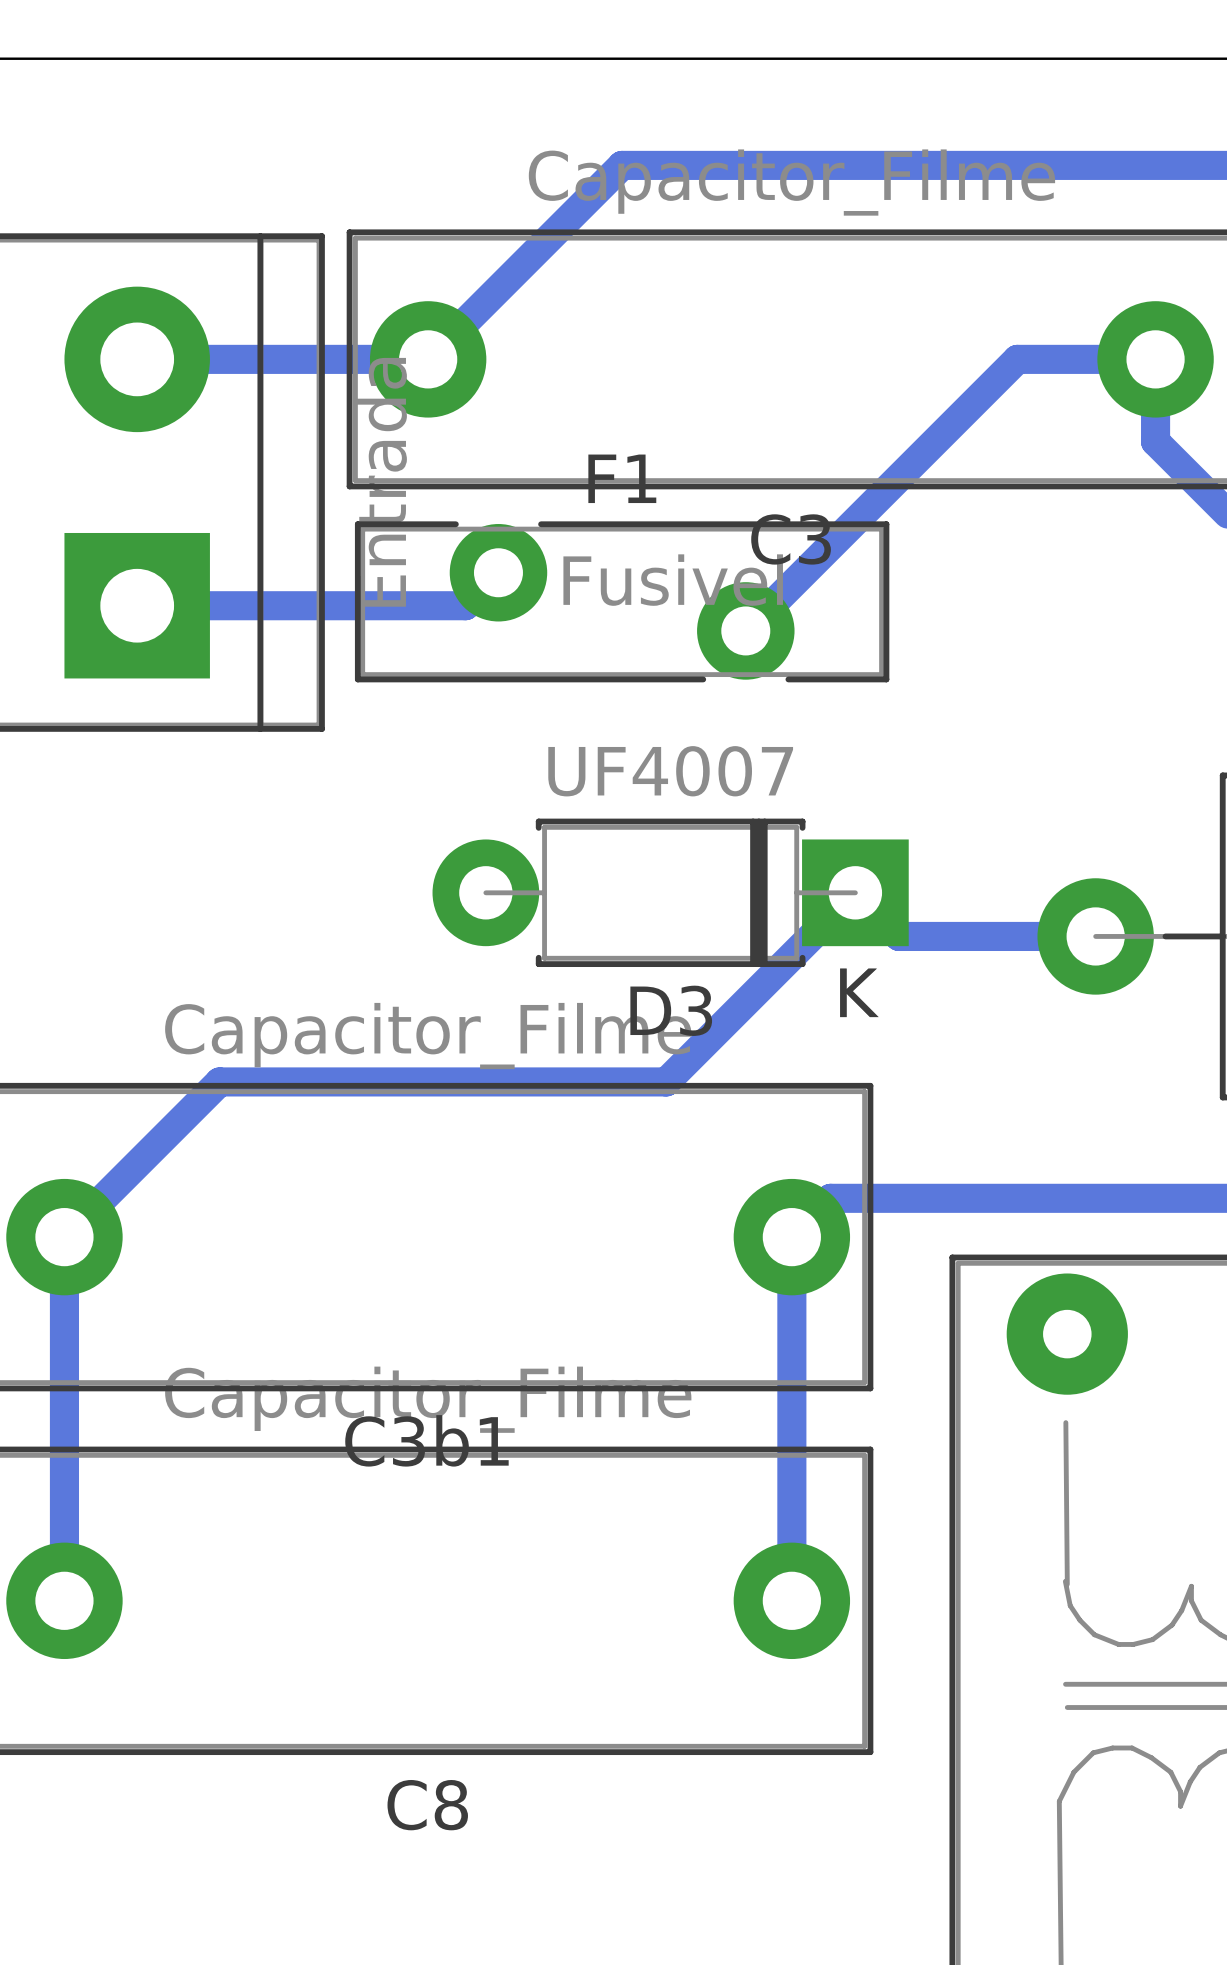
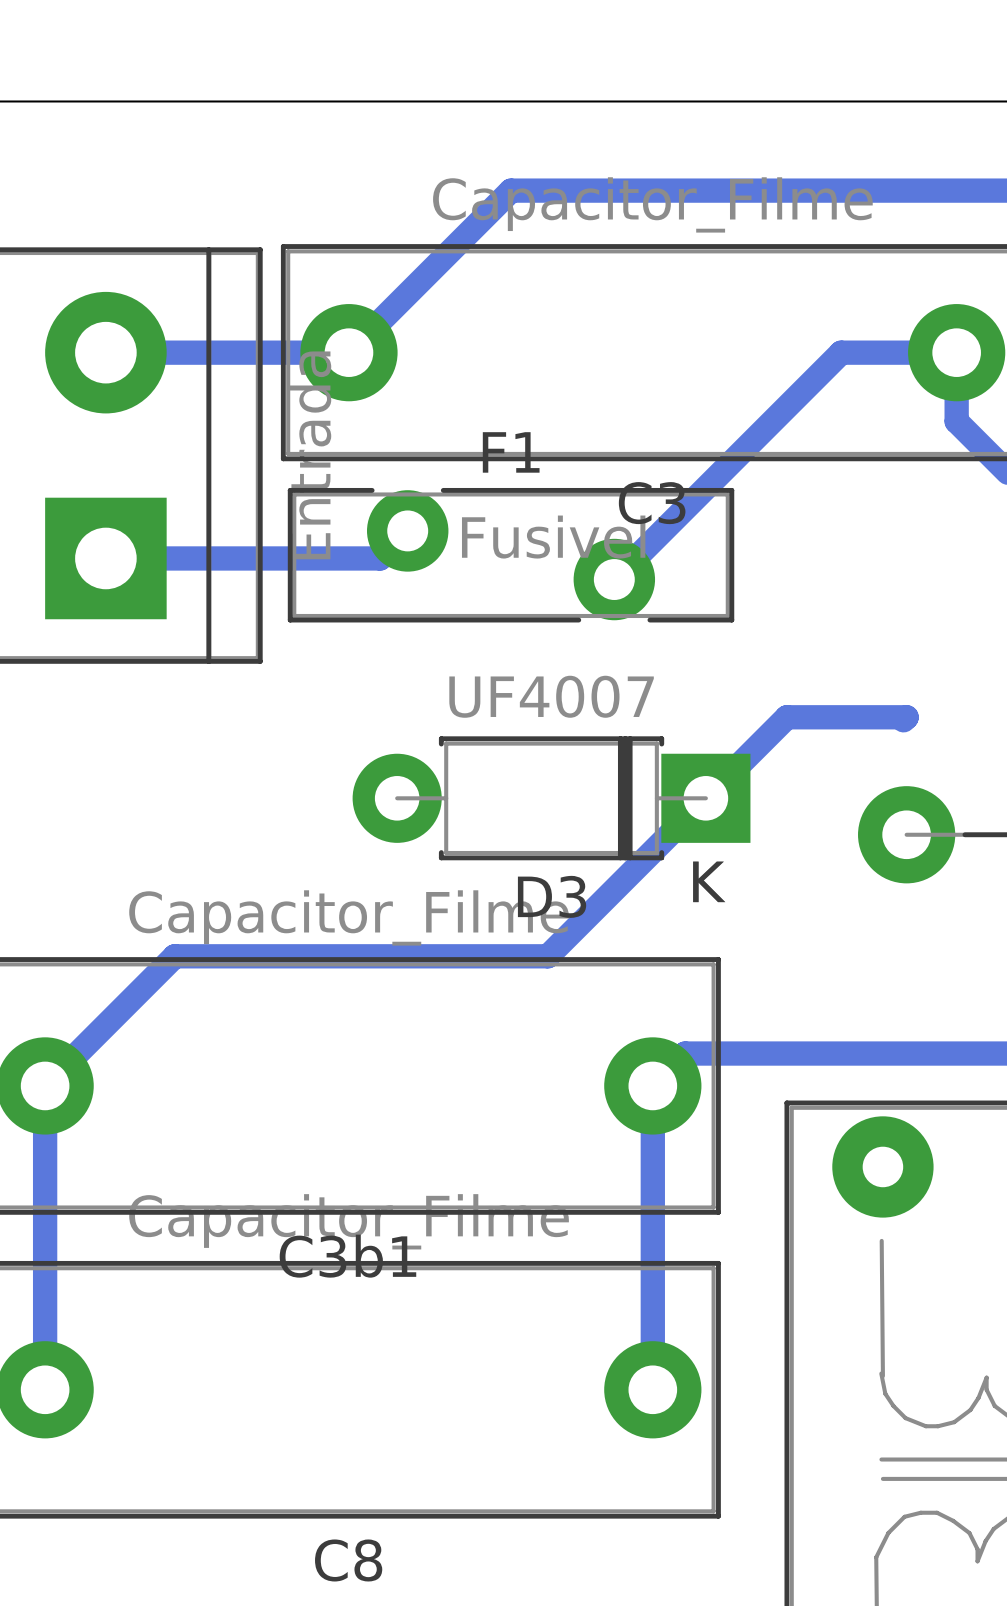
bottom track: (855, 892) (899, 936) (1095, 936) -> (705, 798) (786, 717) (906, 717) (903, 720)

